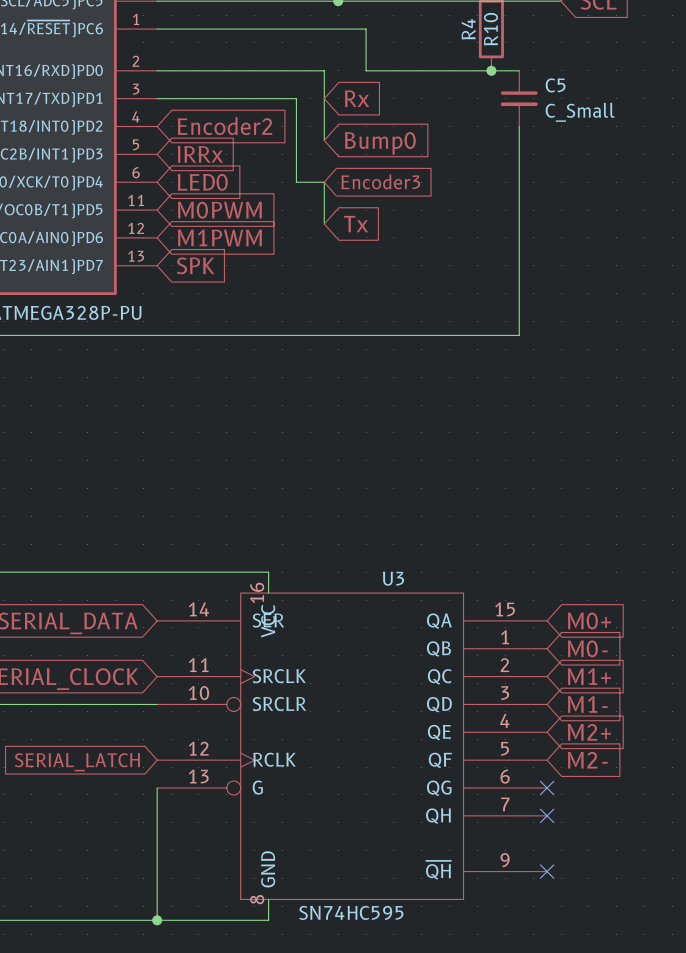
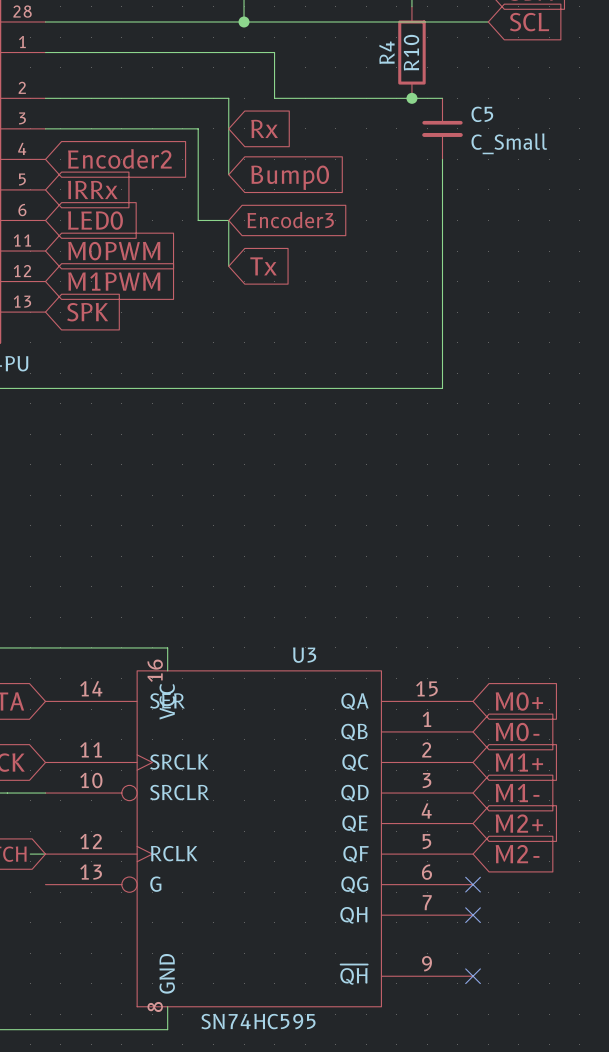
wire: none -> (30, 854) (45, 854)
wire: (157, 788) (157, 920) -> none
junction: (157, 920) -> none

